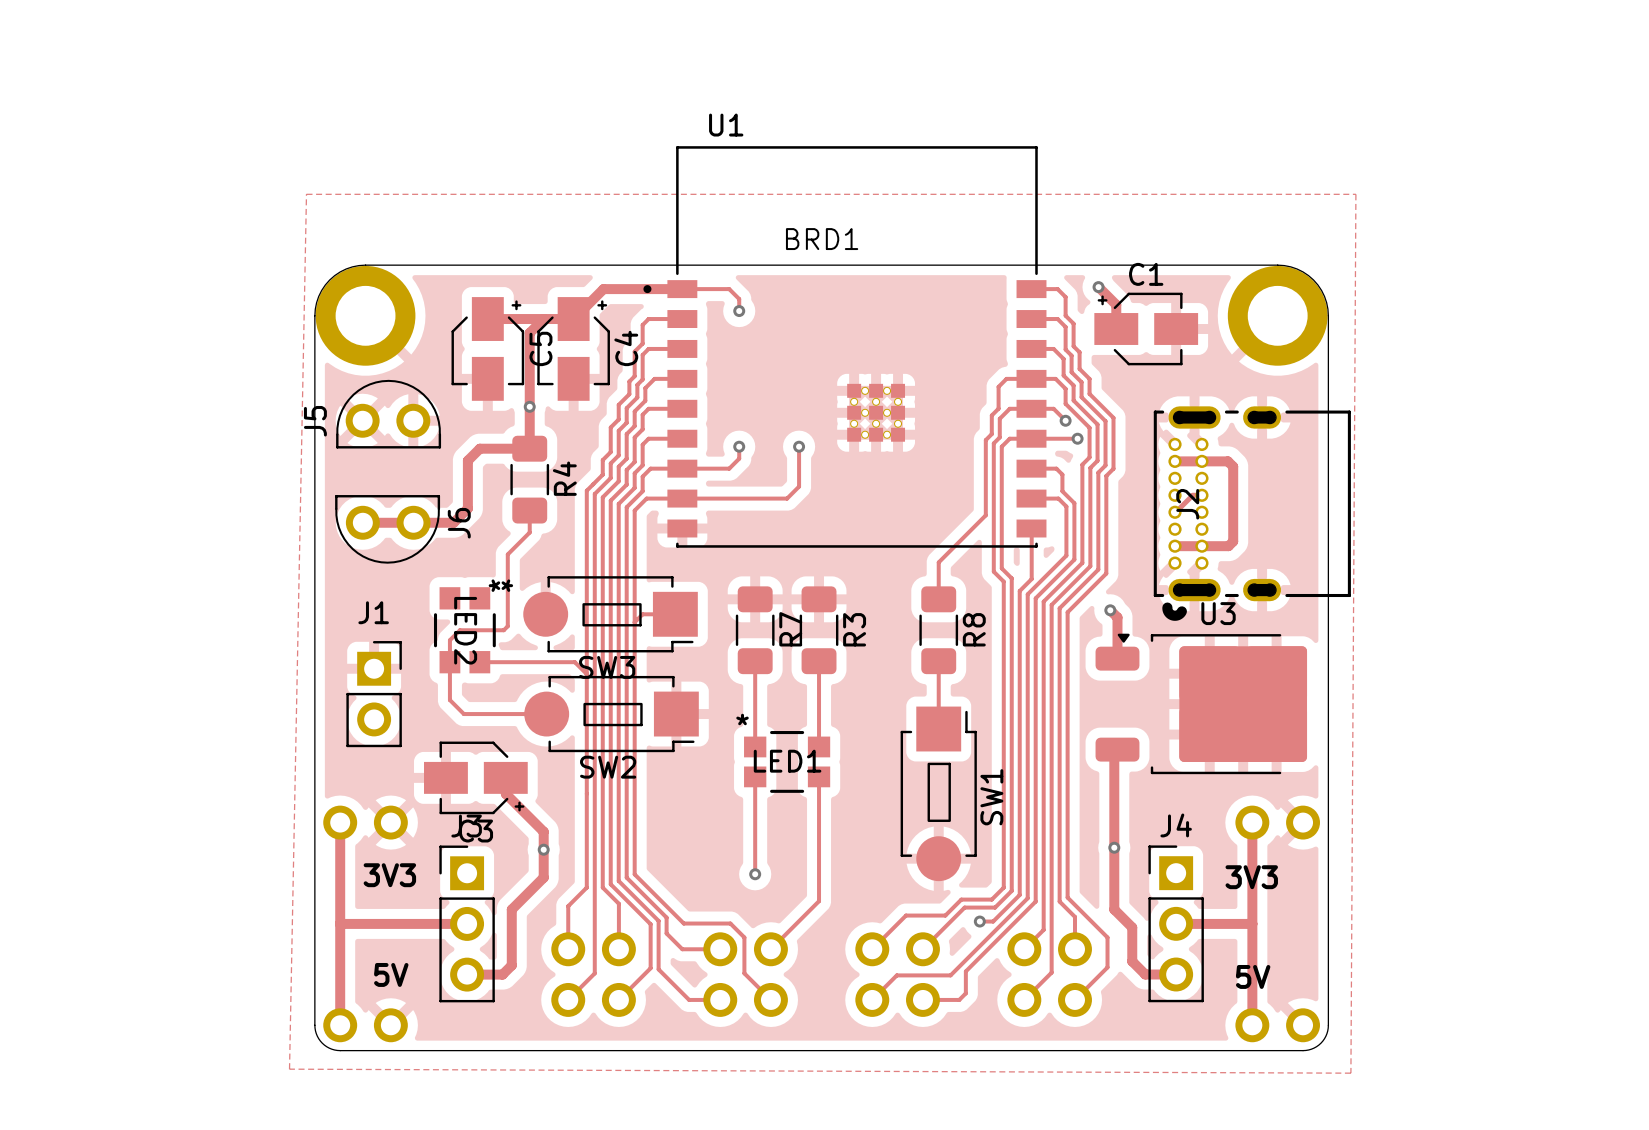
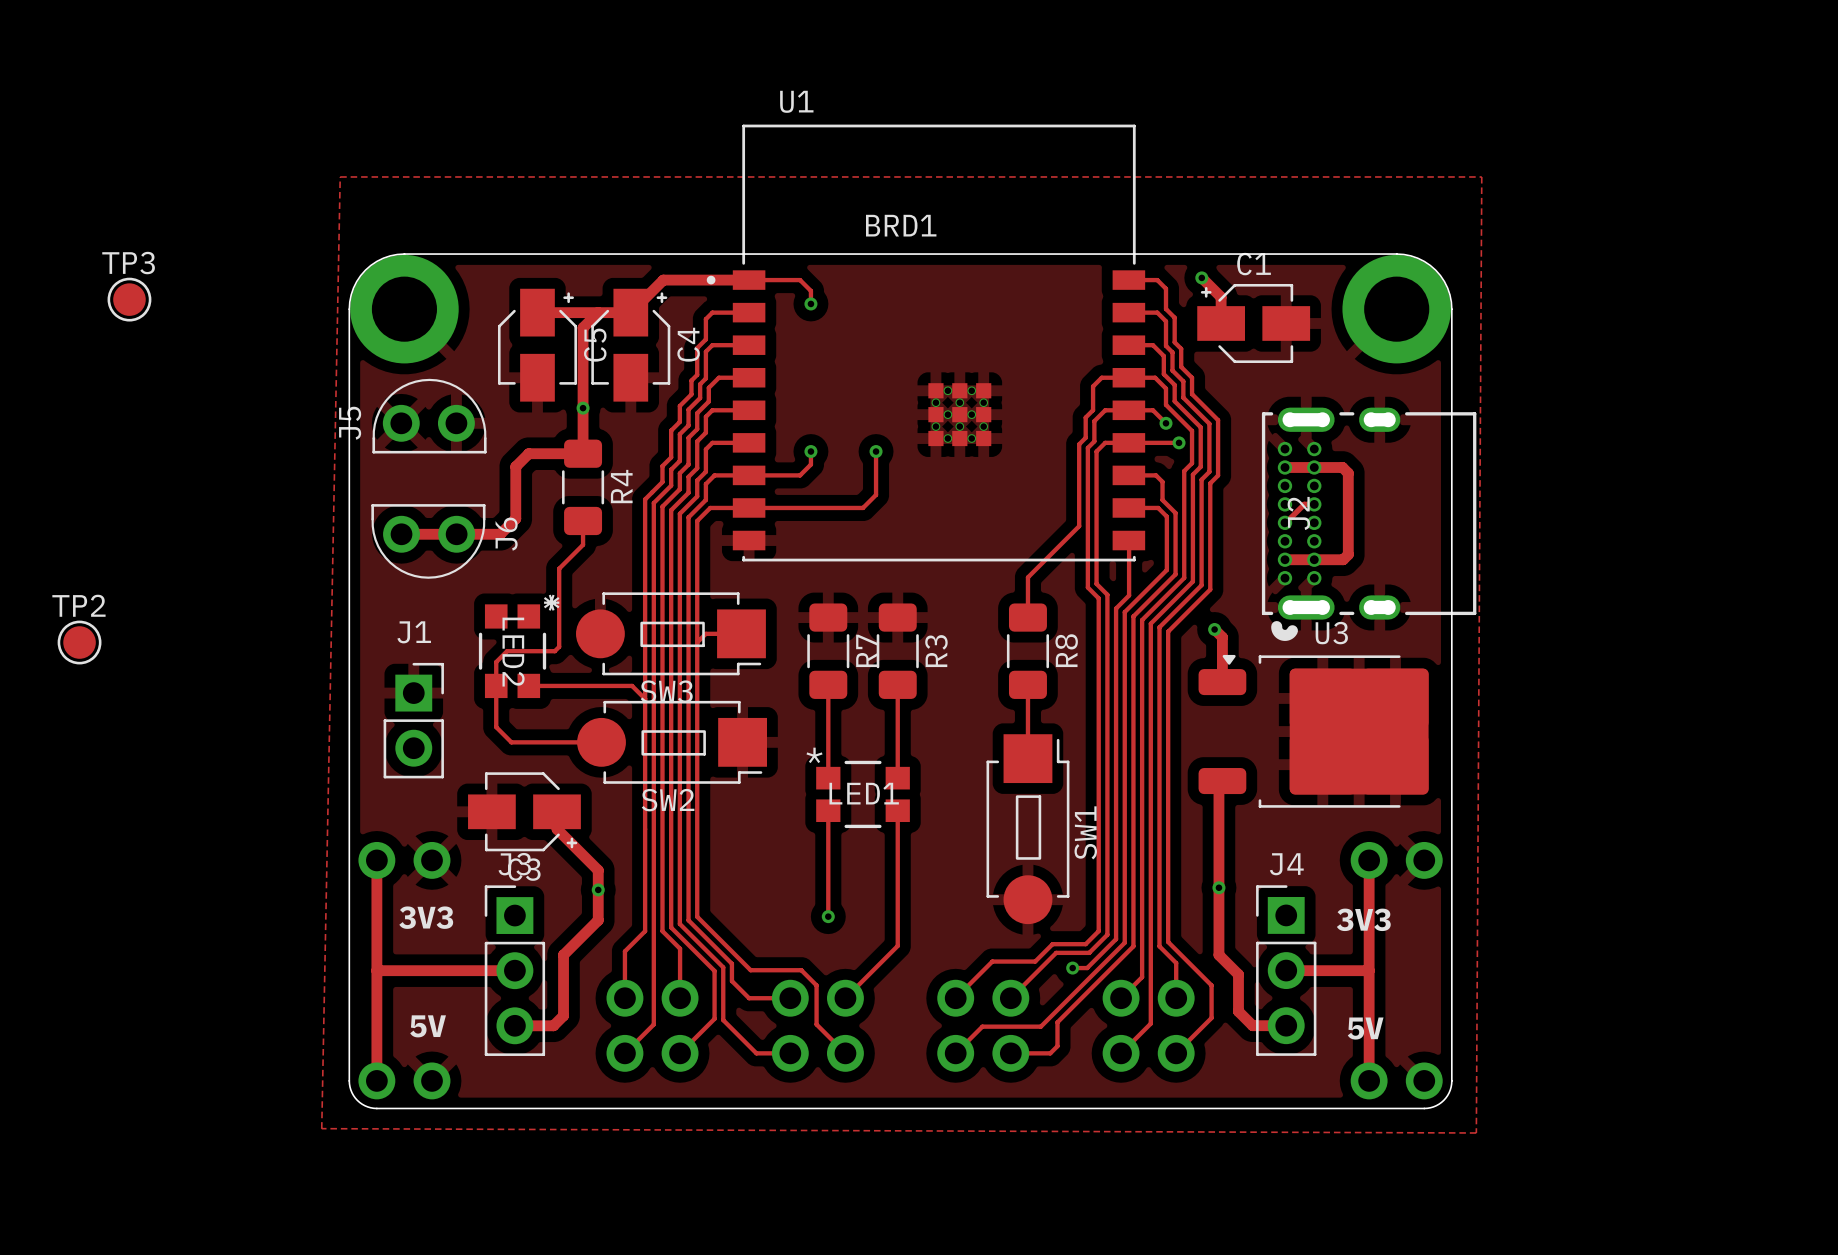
TP3: none -> (129, 299)
TP2: none -> (79, 642)

